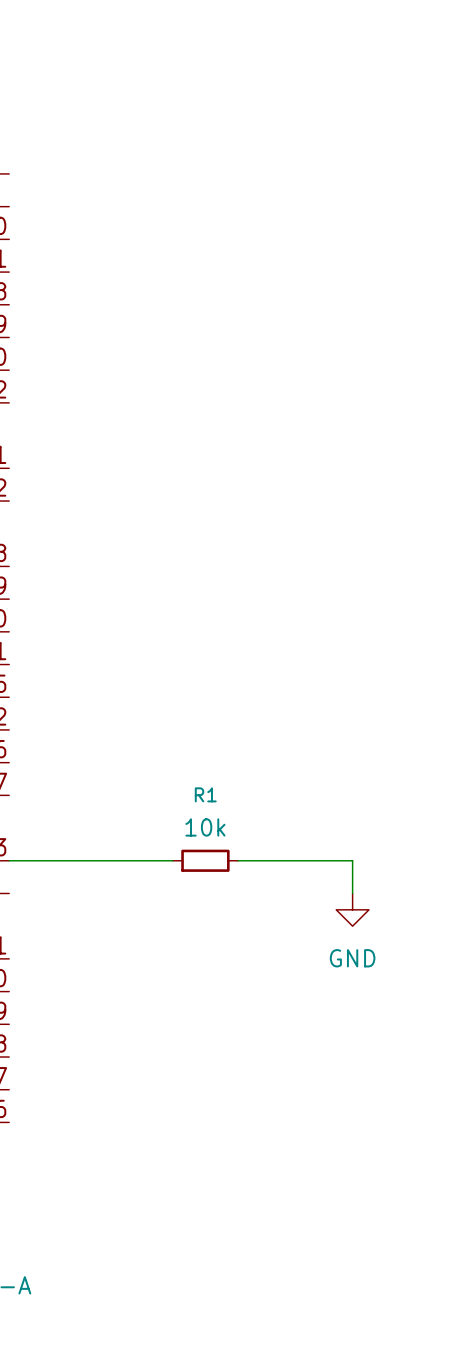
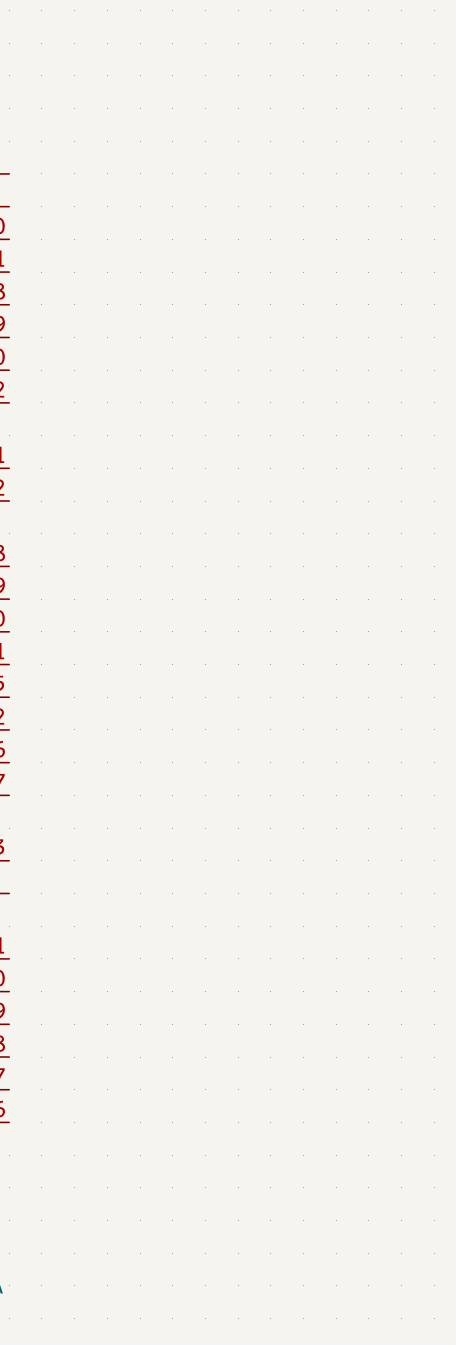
wire: (9, 860) (172, 860) -> none
R1: 10k (205, 860) -> none
wire: (238, 860) (352, 860) (352, 893) -> none
power symbol: GND (352, 909) -> none

